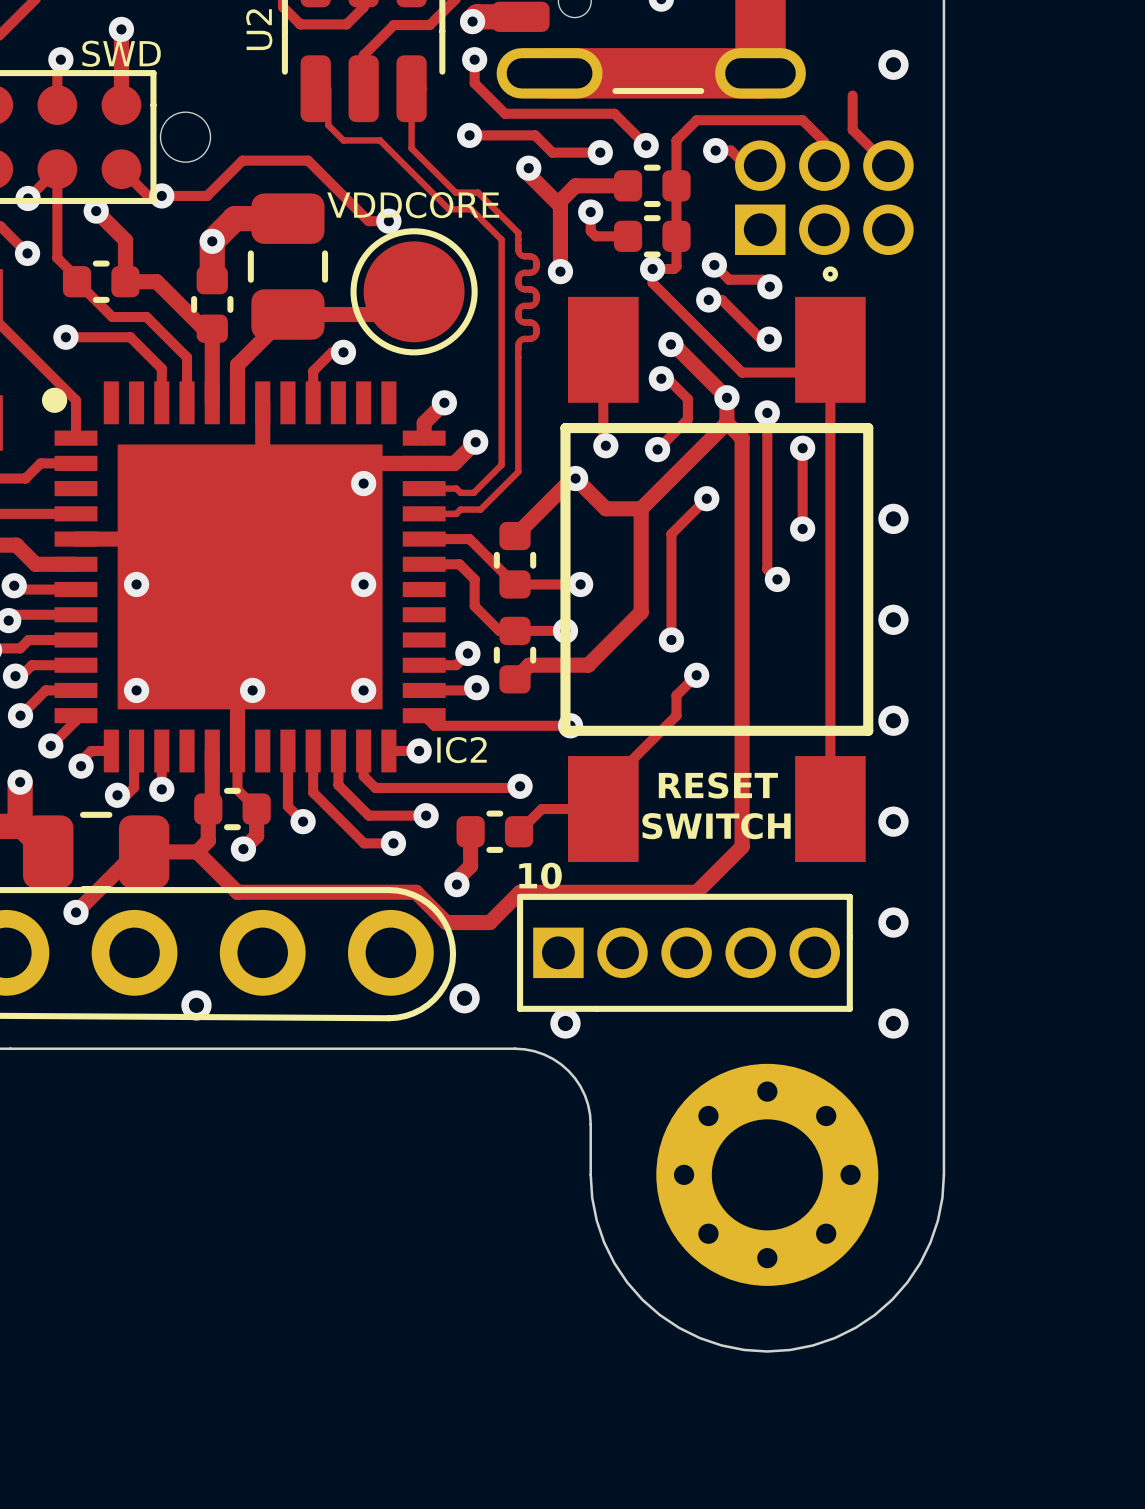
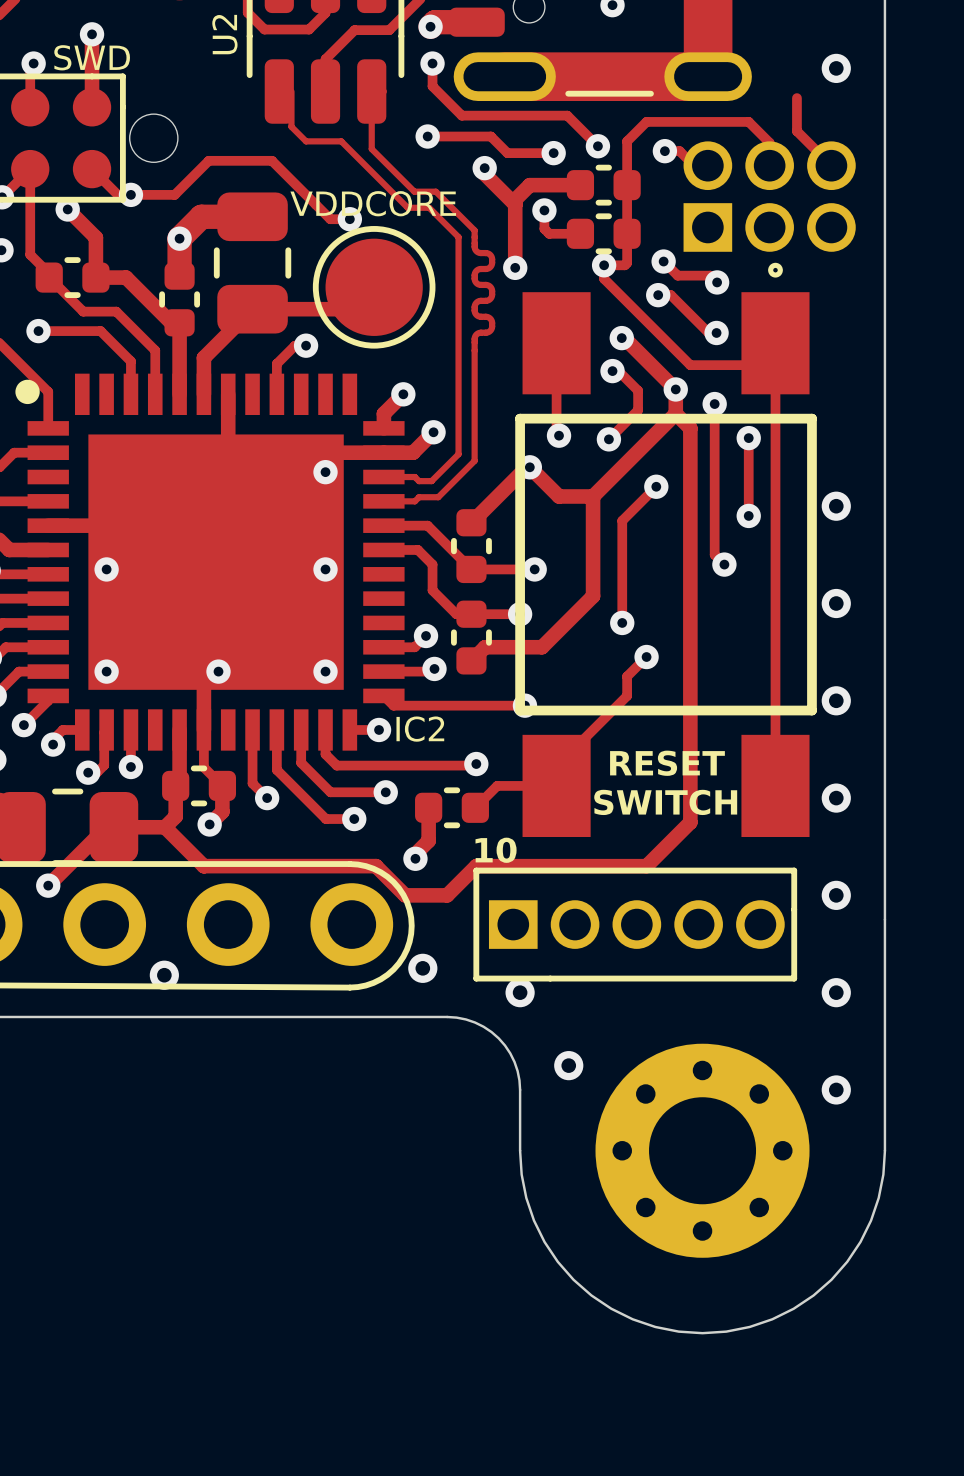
board edge: (489, 1048) (524, 1049) (543, 1054) (561, 1064) (575, 1078) (584, 1095) (590, 1114) (590, 1174) (592, 1197) (596, 1220) (604, 1242) (614, 1263) (627, 1282) (642, 1299) (659, 1314) (679, 1327) (699, 1338) (721, 1345) (744, 1349) (767, 1351) (790, 1349) (813, 1345) (834, 1338) (855, 1327) (874, 1314) (892, 1299) (907, 1282) (920, 1263) (930, 1242) (937, 1220) (942, 1197) (943, 1174) -> (447, 1016) (466, 1019) (491, 1032) (505, 1045) (514, 1062) (519, 1080) (520, 1150) (521, 1174) (526, 1197) (533, 1220) (544, 1241) (557, 1261) (573, 1279) (591, 1295) (611, 1308) (632, 1319) (655, 1326) (678, 1331) (702, 1333) (726, 1331) (749, 1326) (772, 1319) (793, 1308) (813, 1295) (831, 1279) (847, 1261) (860, 1241) (871, 1220) (878, 1197) (883, 1174) (884, 1138)
via: none -> (568, 1065)
via: none -> (836, 1089)
part position: (767, 1174) -> (702, 1150)

